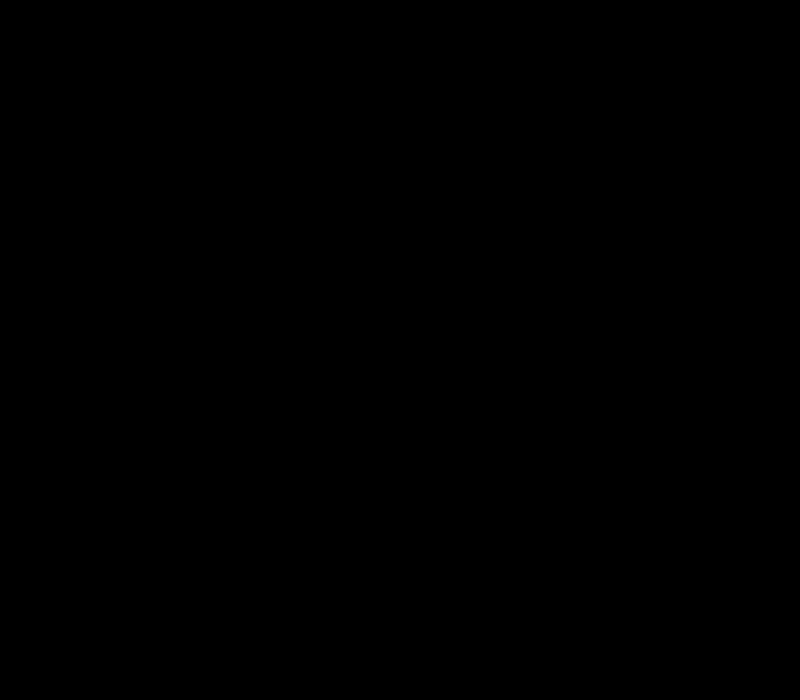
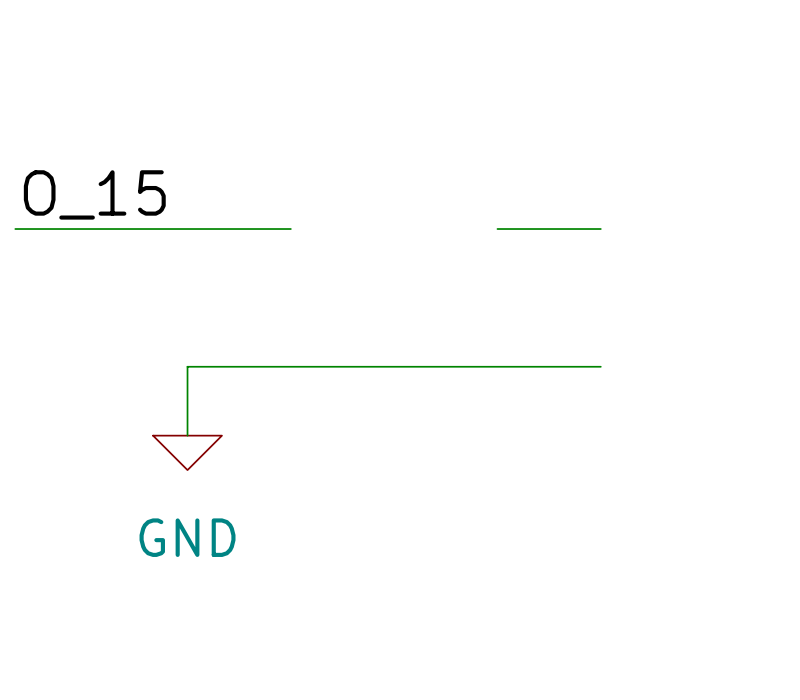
label: none -> O_15 (94, 194)
wire: none -> (15, 229) (290, 229)
wire: none -> (497, 229) (600, 229)
wire: none -> (600, 366) (187, 366) (187, 435)
power symbol: none -> GND (187, 452)

